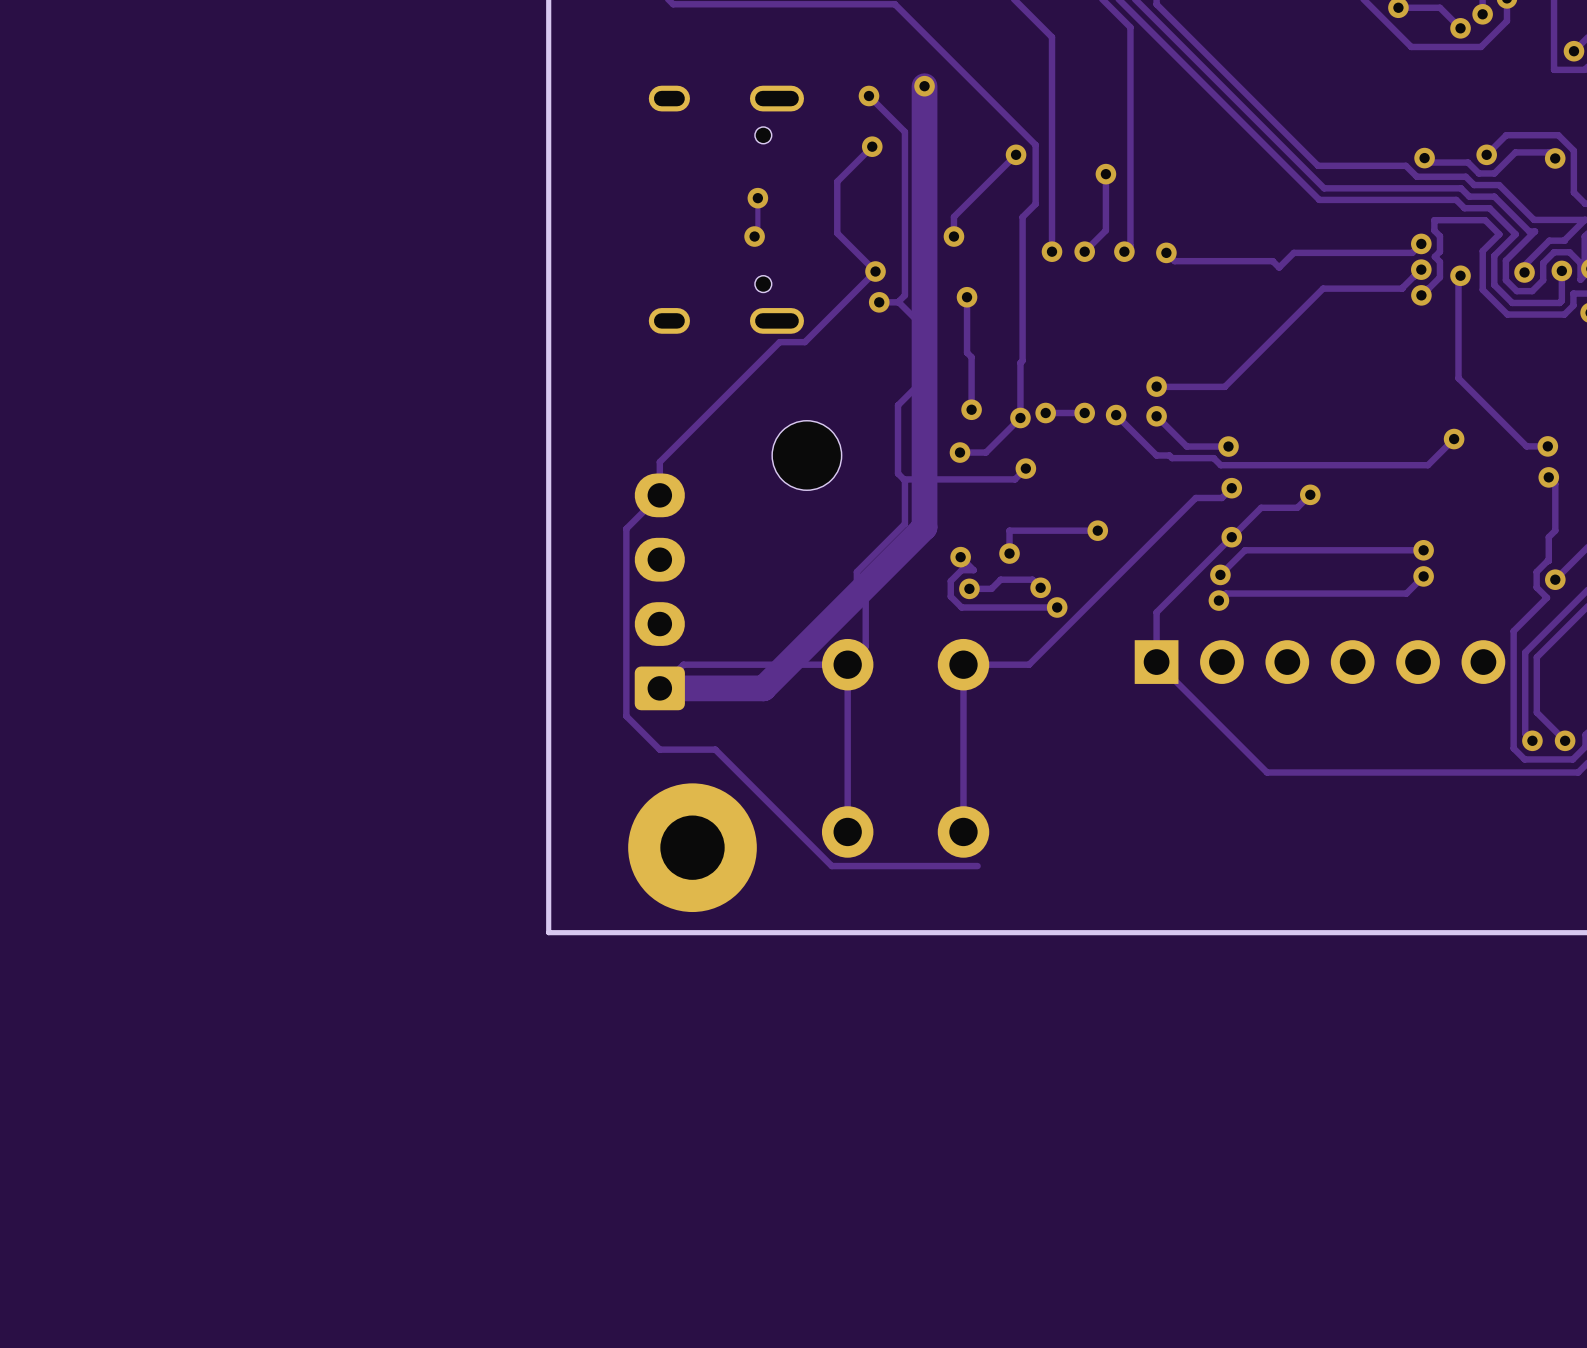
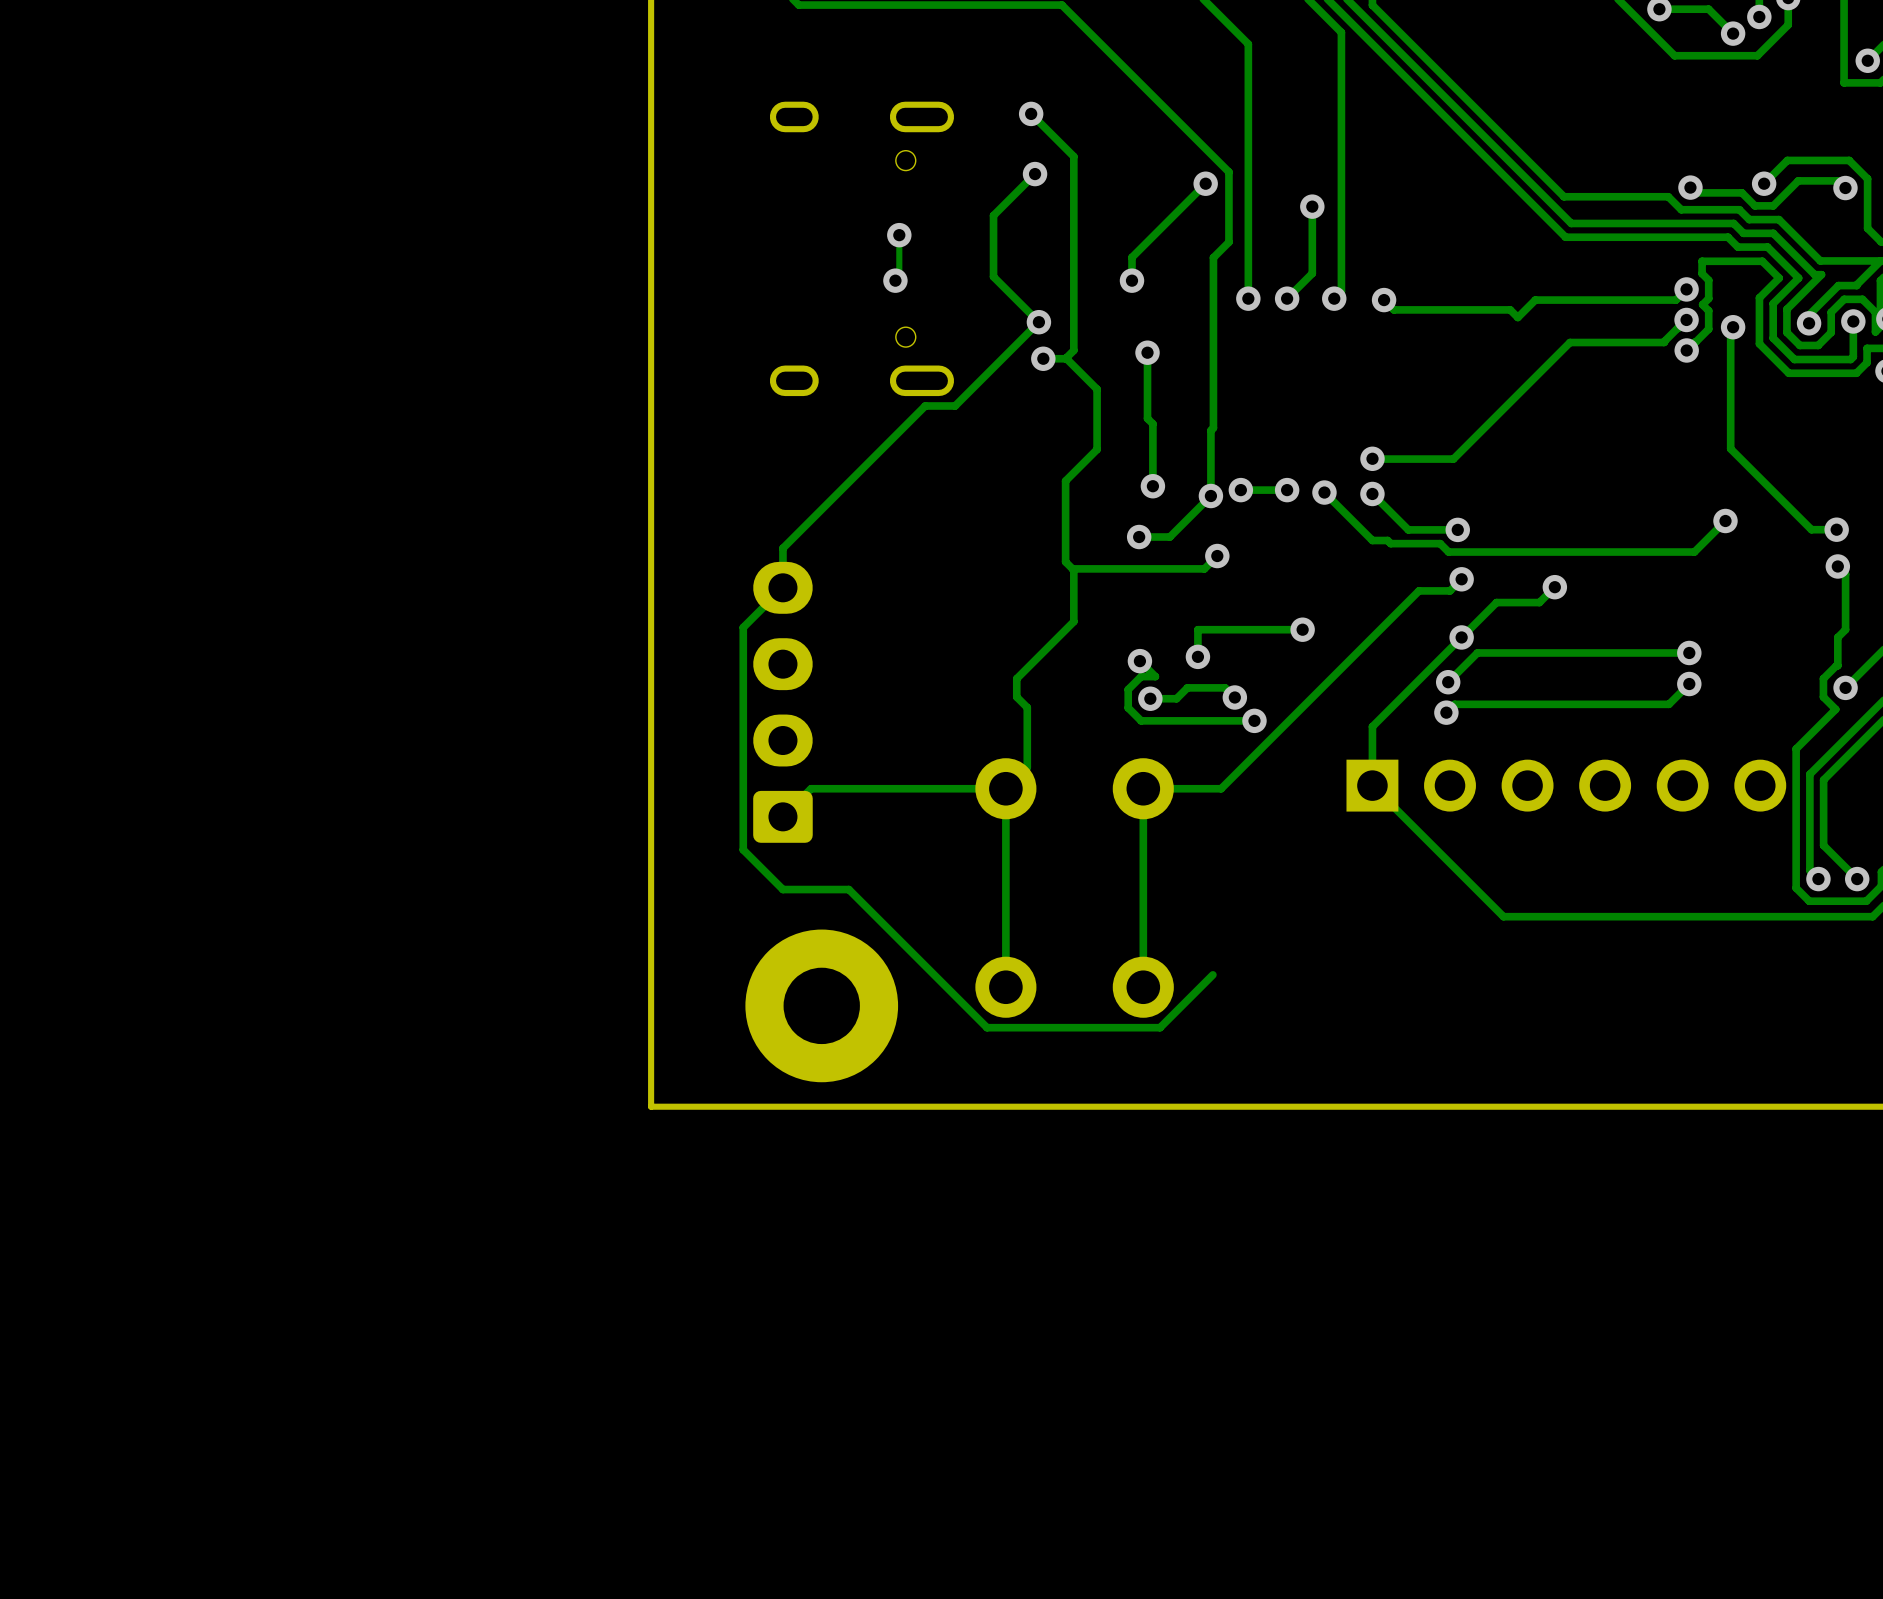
track: (924, 86) (924, 527) (763, 688) (659, 688) -> none
via: (924, 86) -> none
part: (806, 455) -> none
track: none -> (1212, 974) (1160, 1027)

